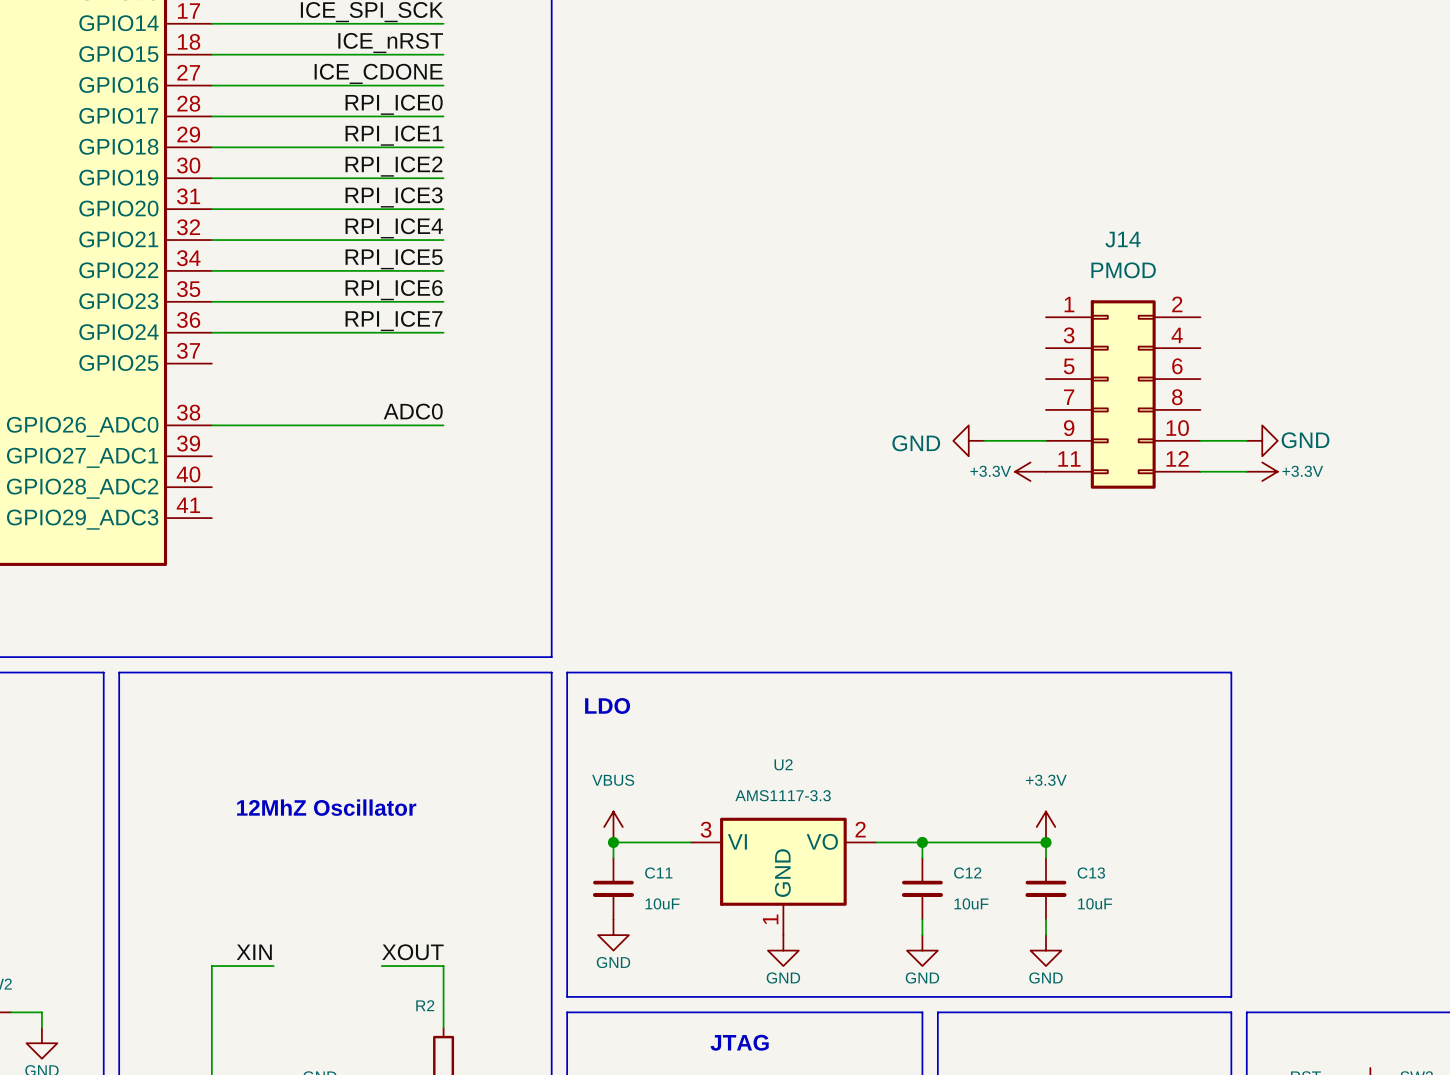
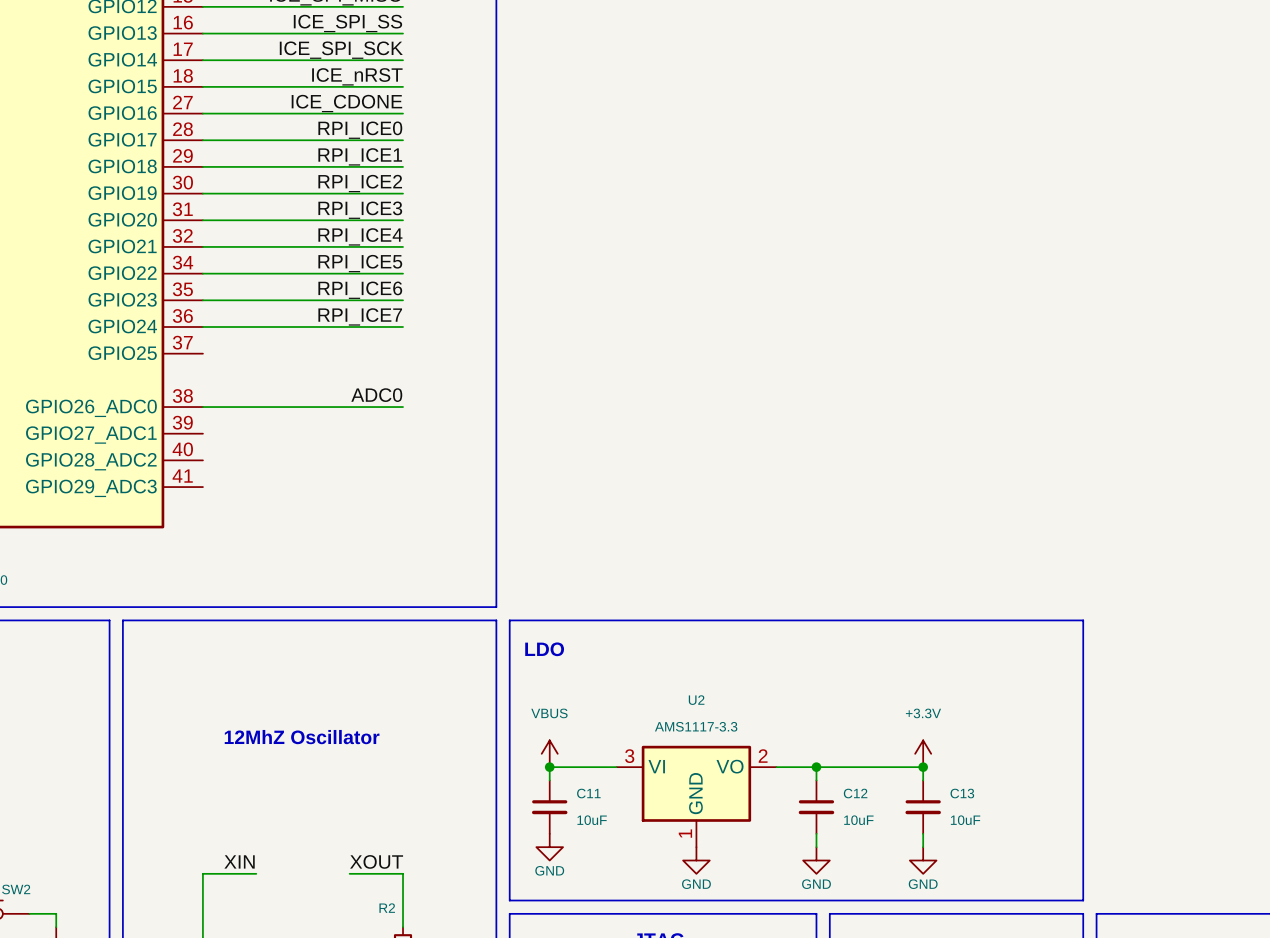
J14: PMOD (1123, 394) -> none
power symbol: GND (968, 440) -> none
wire: (984, 440) (1045, 440) -> none
wire: (1200, 440) (1246, 440) -> none
power symbol: GND (1262, 440) -> none
power symbol: +3.3V (1030, 471) -> none
wire: (1200, 471) (1246, 471) -> none
power symbol: +3.3V (1262, 471) -> none

